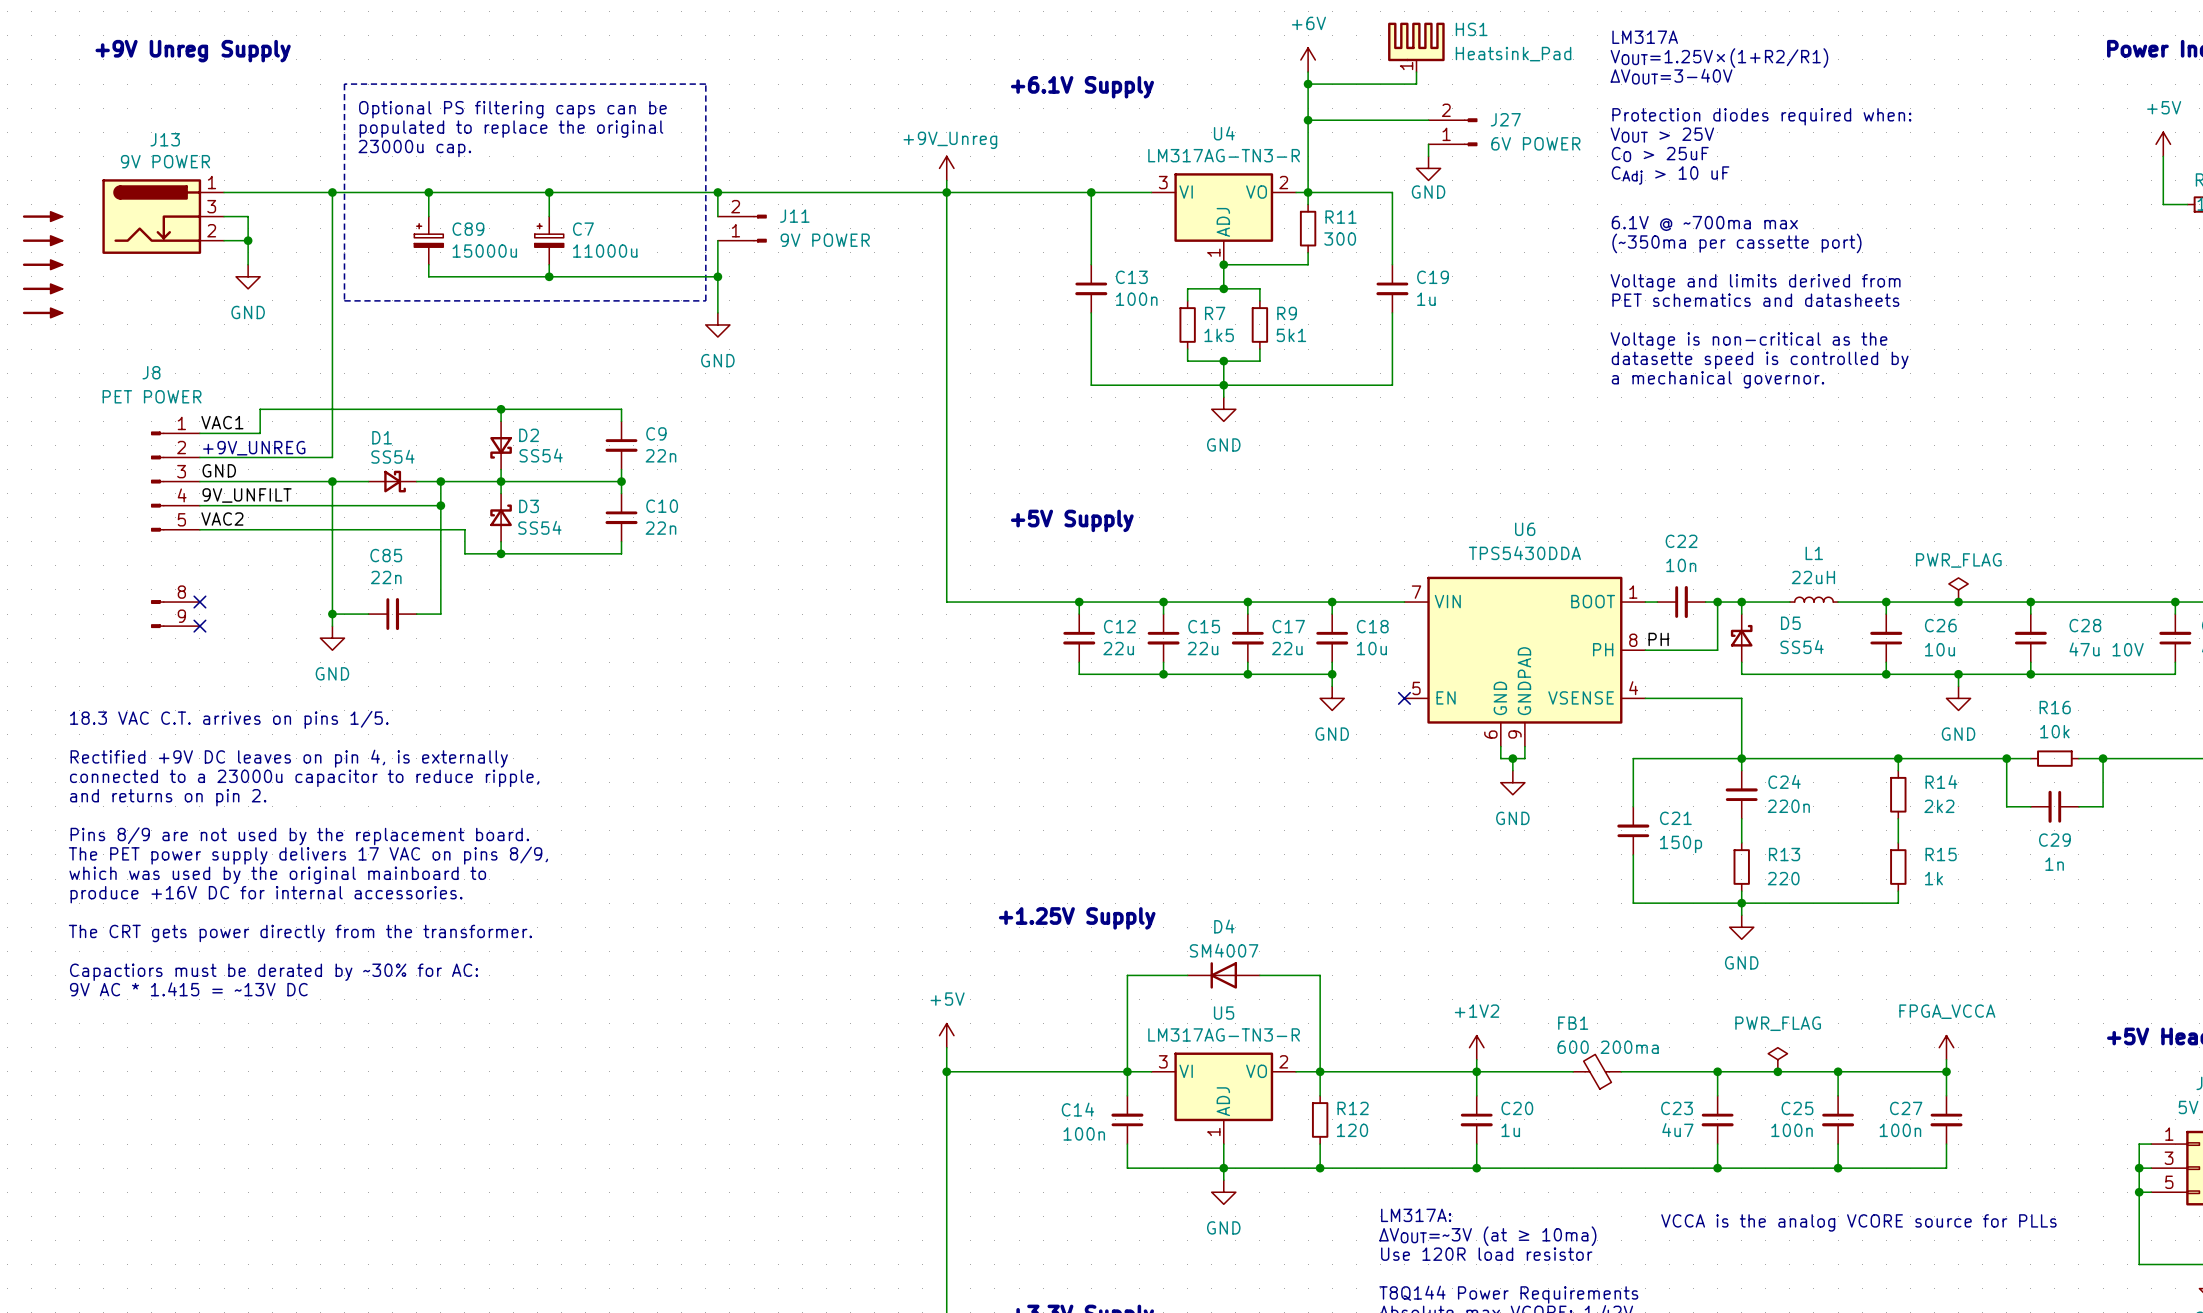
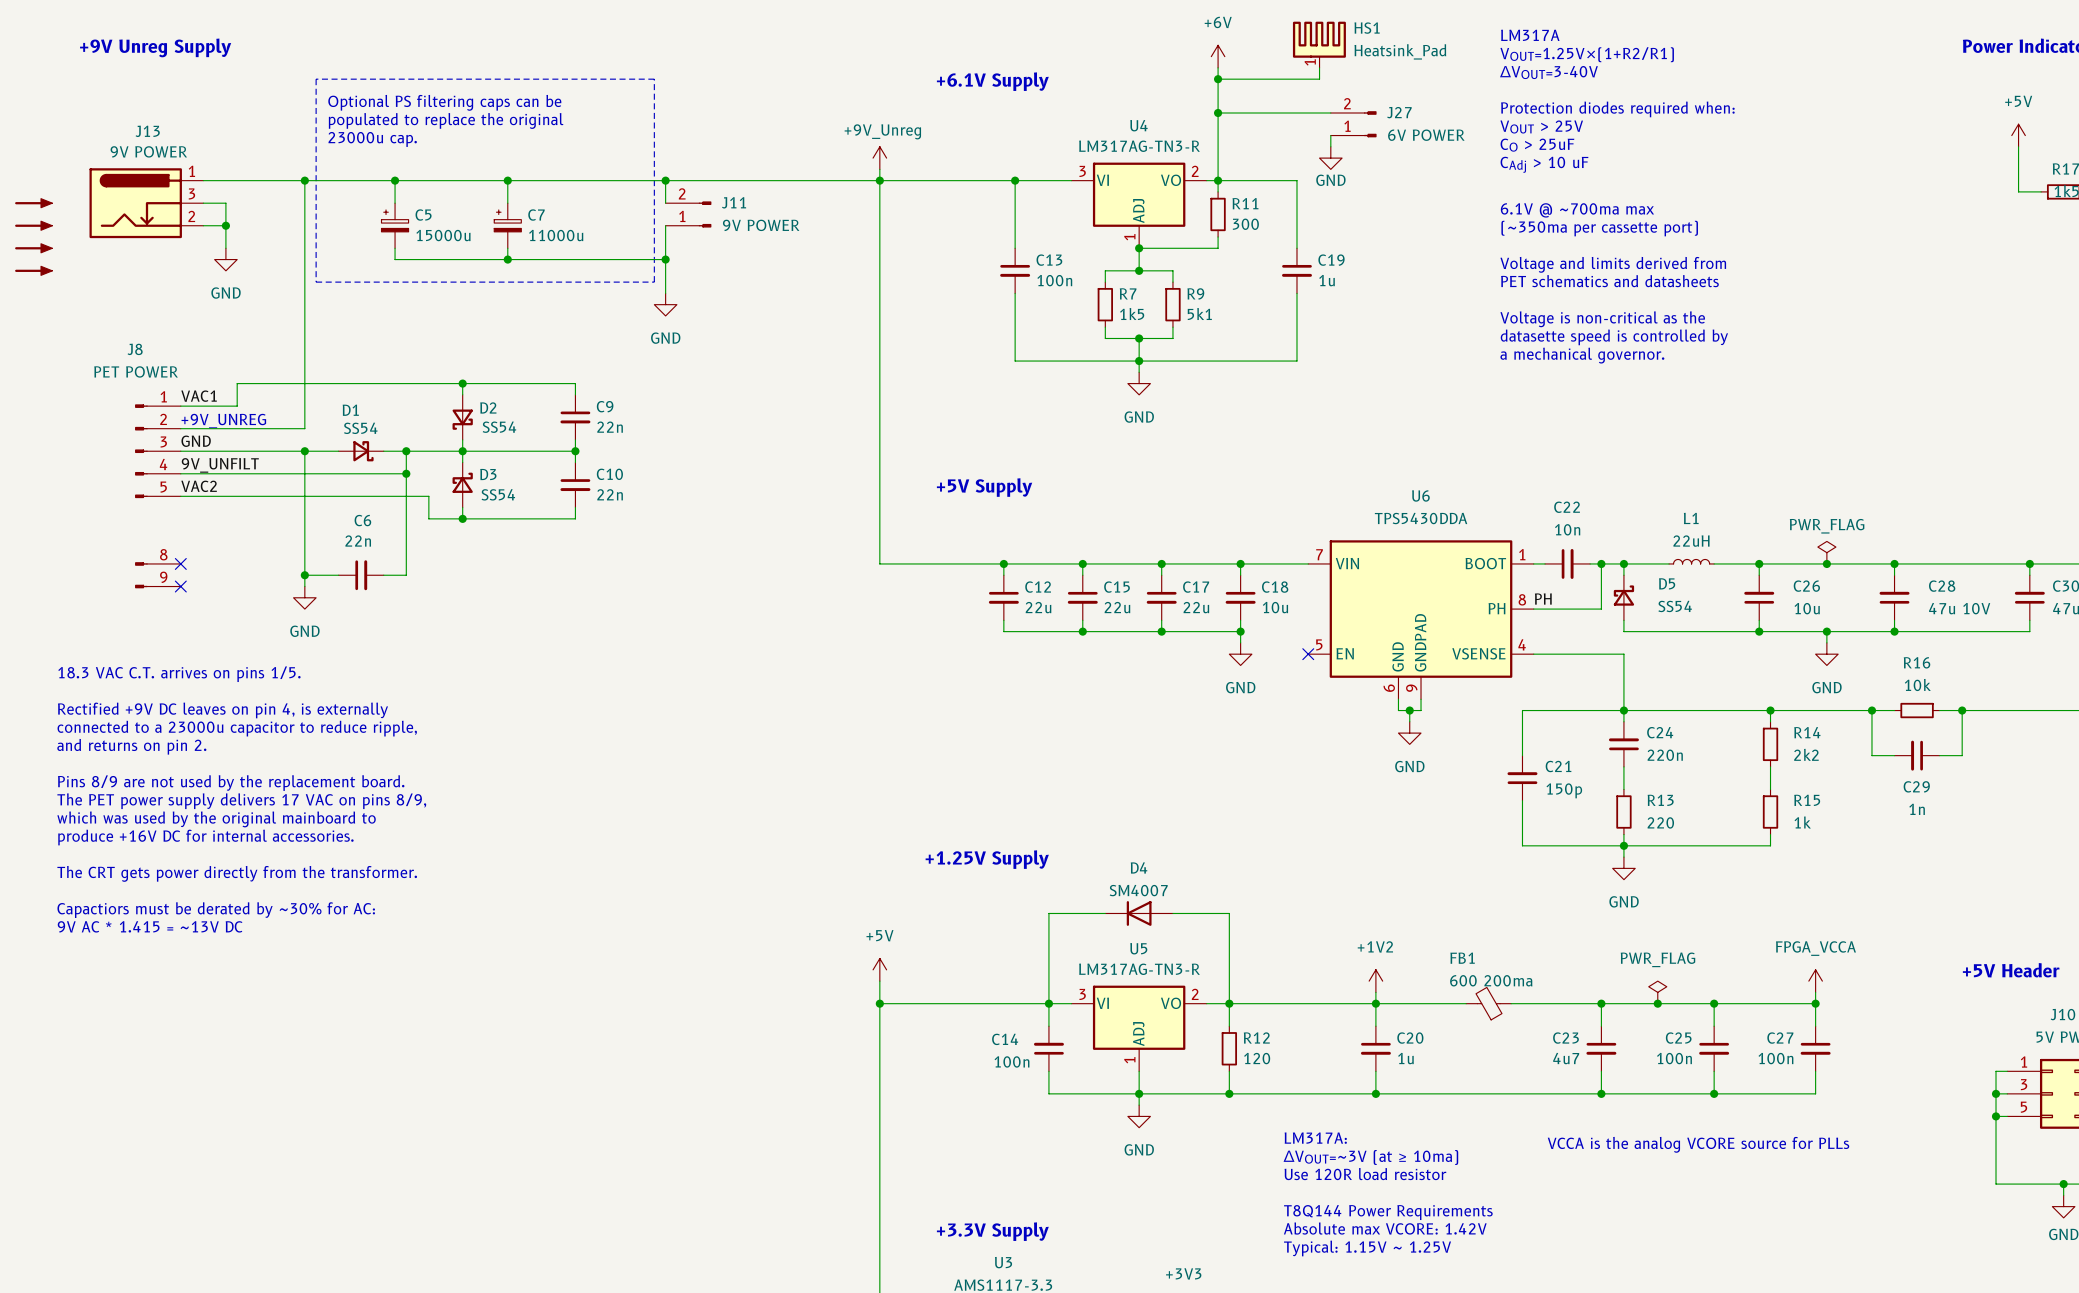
C89 name: C89 (468, 229) -> C5 (423, 215)
part: (42, 312) -> none
C85 name: C85 (386, 555) -> C6 (362, 520)

